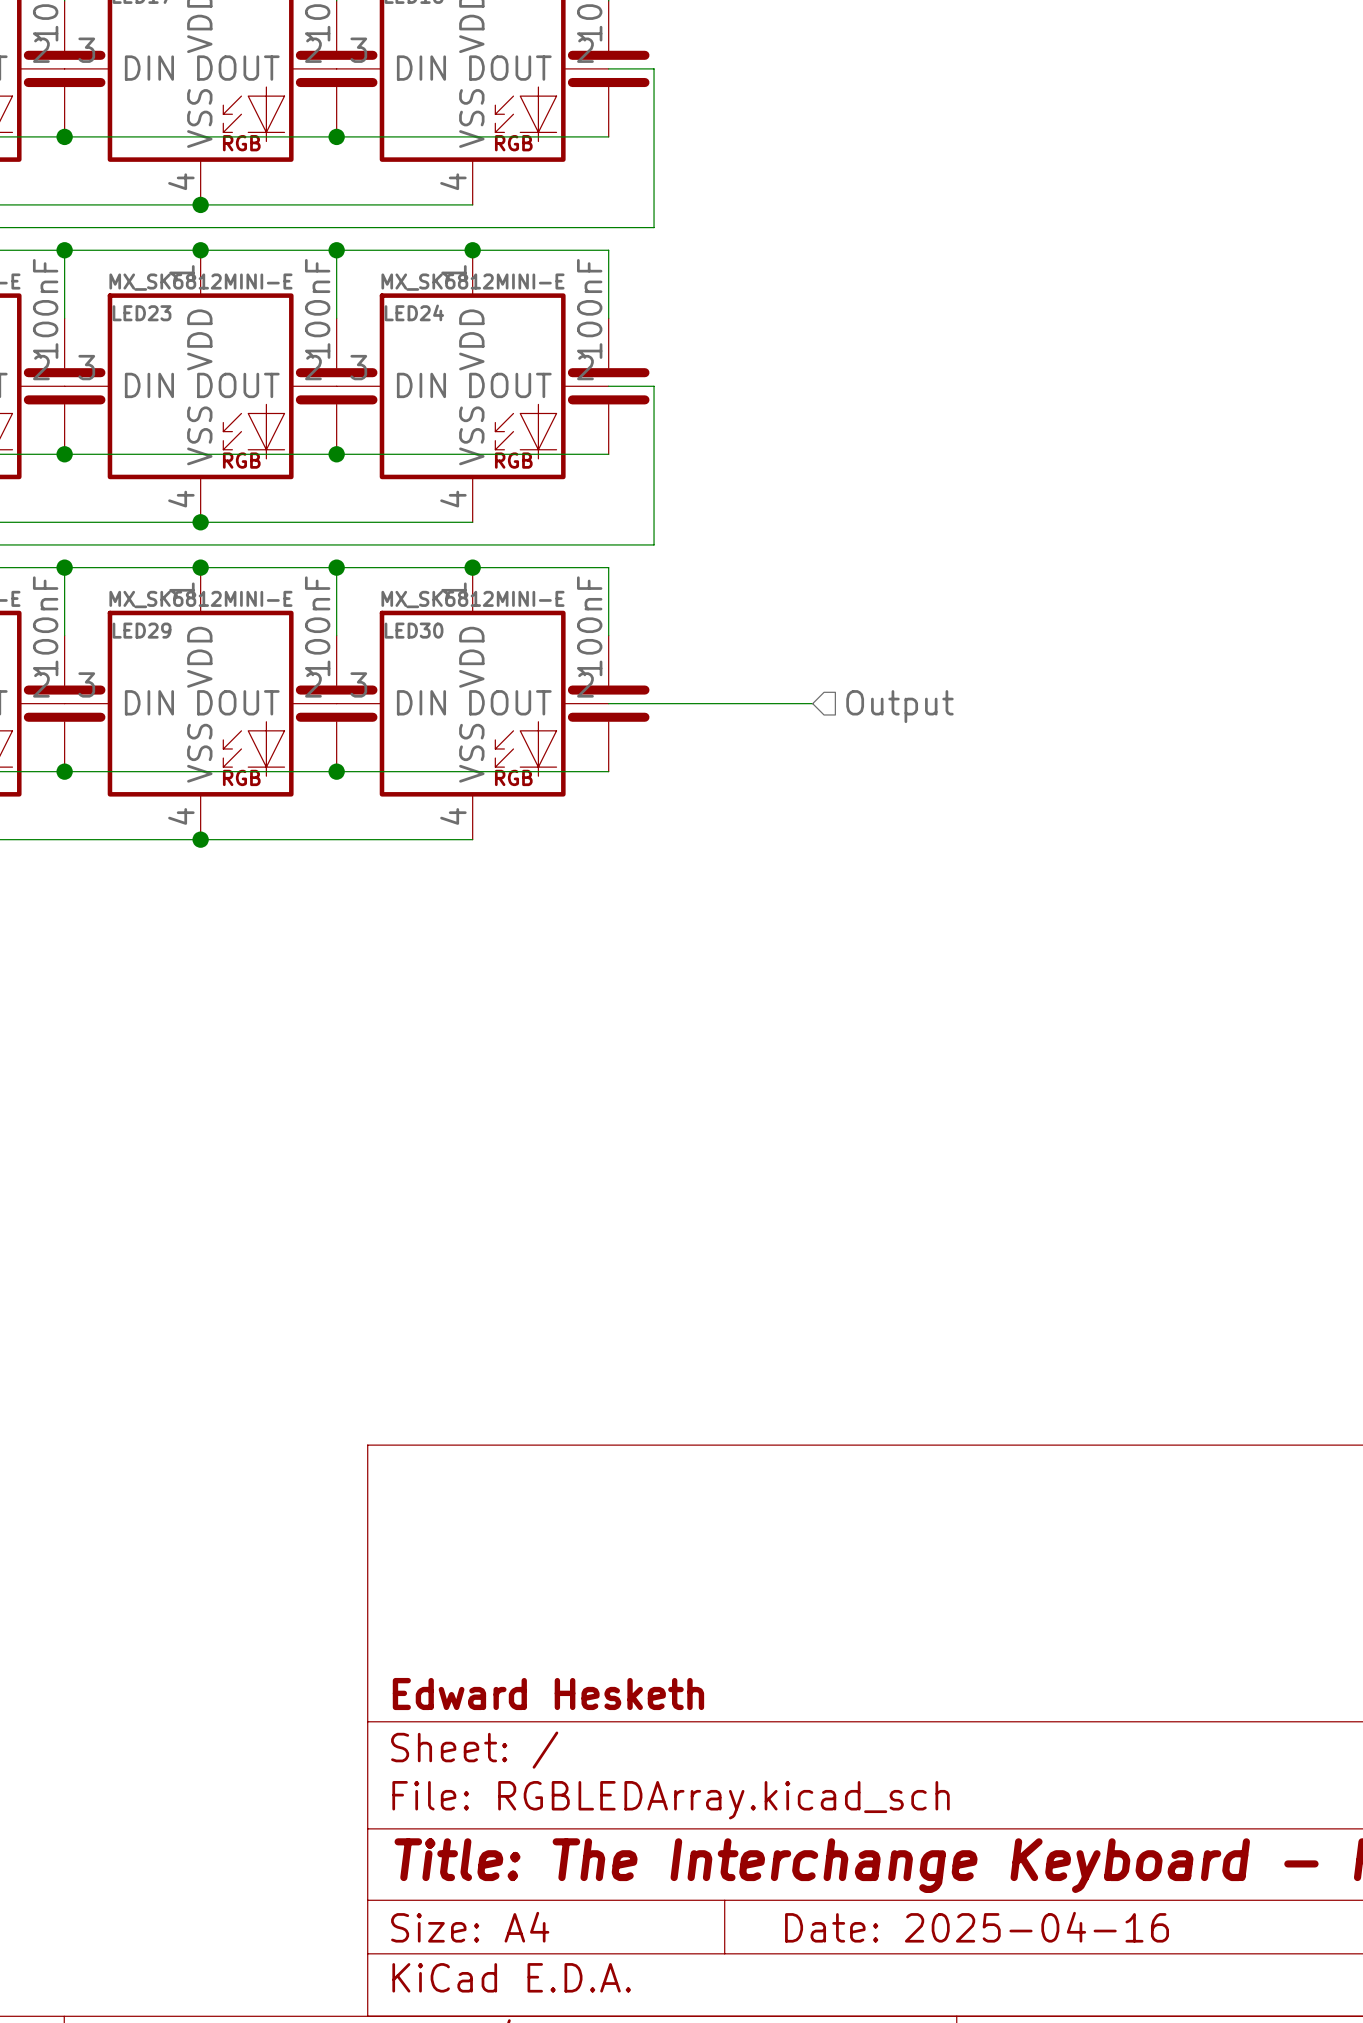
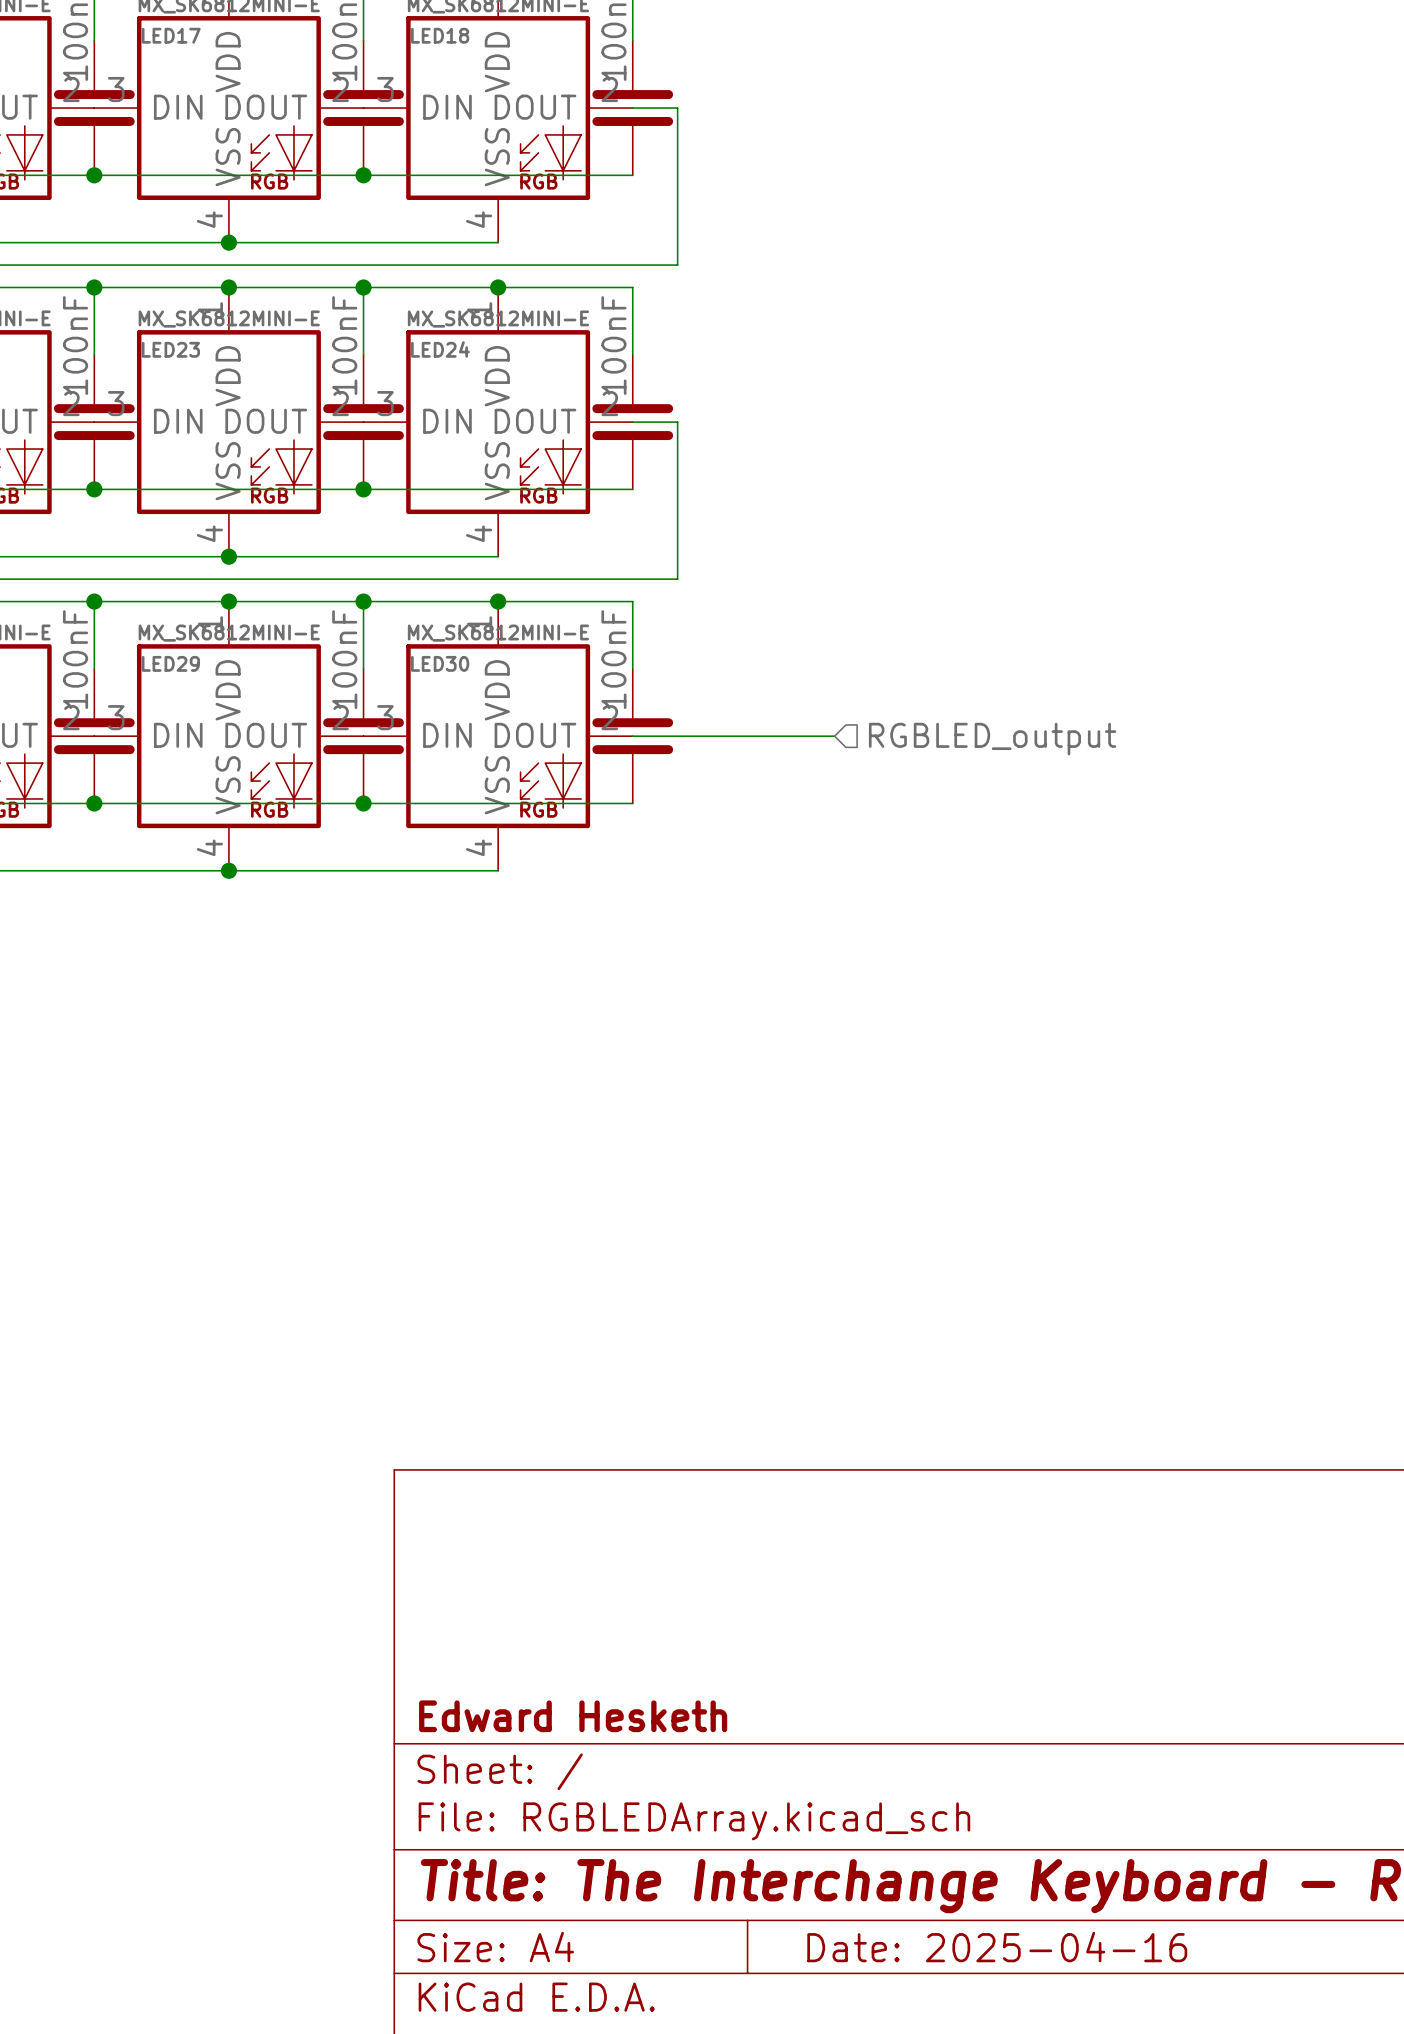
hierarchical label: Output (899, 706) -> RGBLED_output (992, 739)

